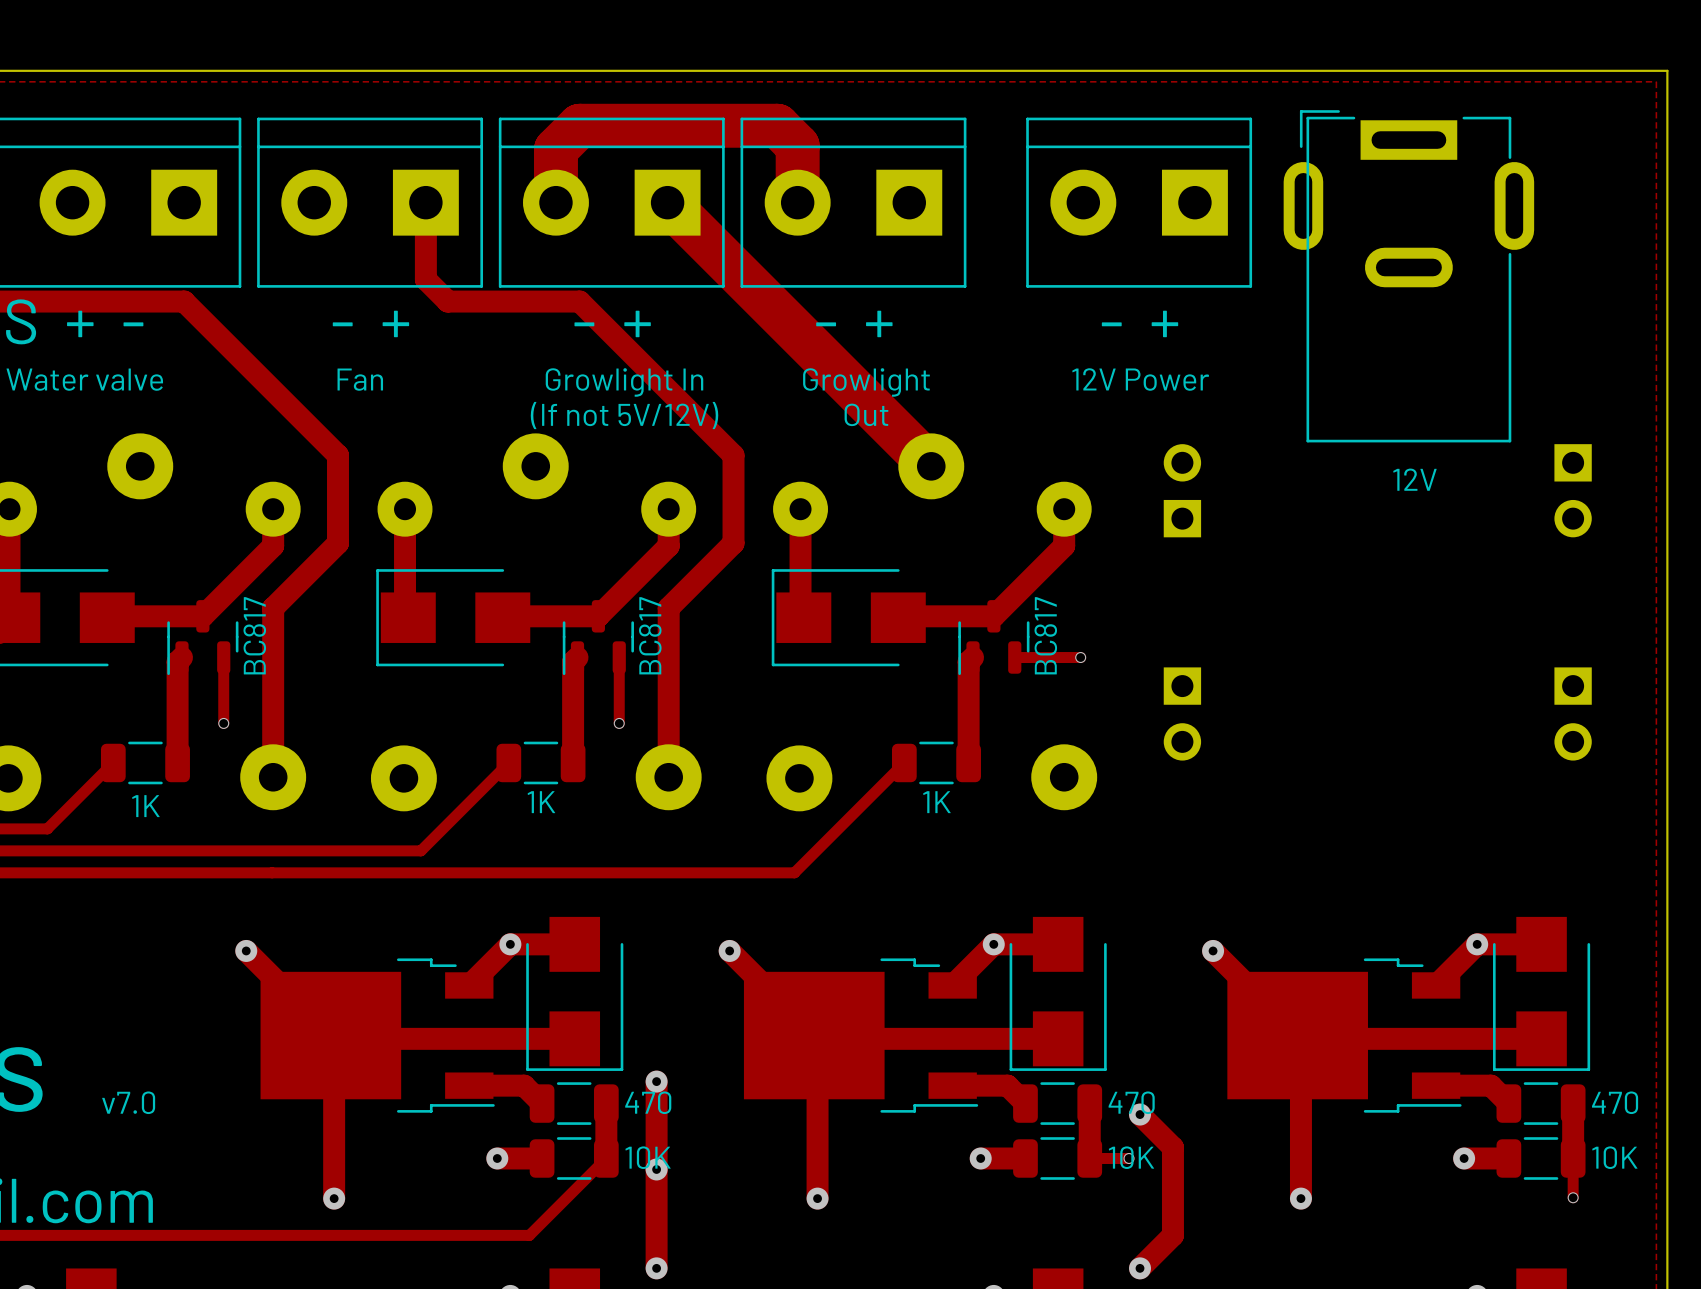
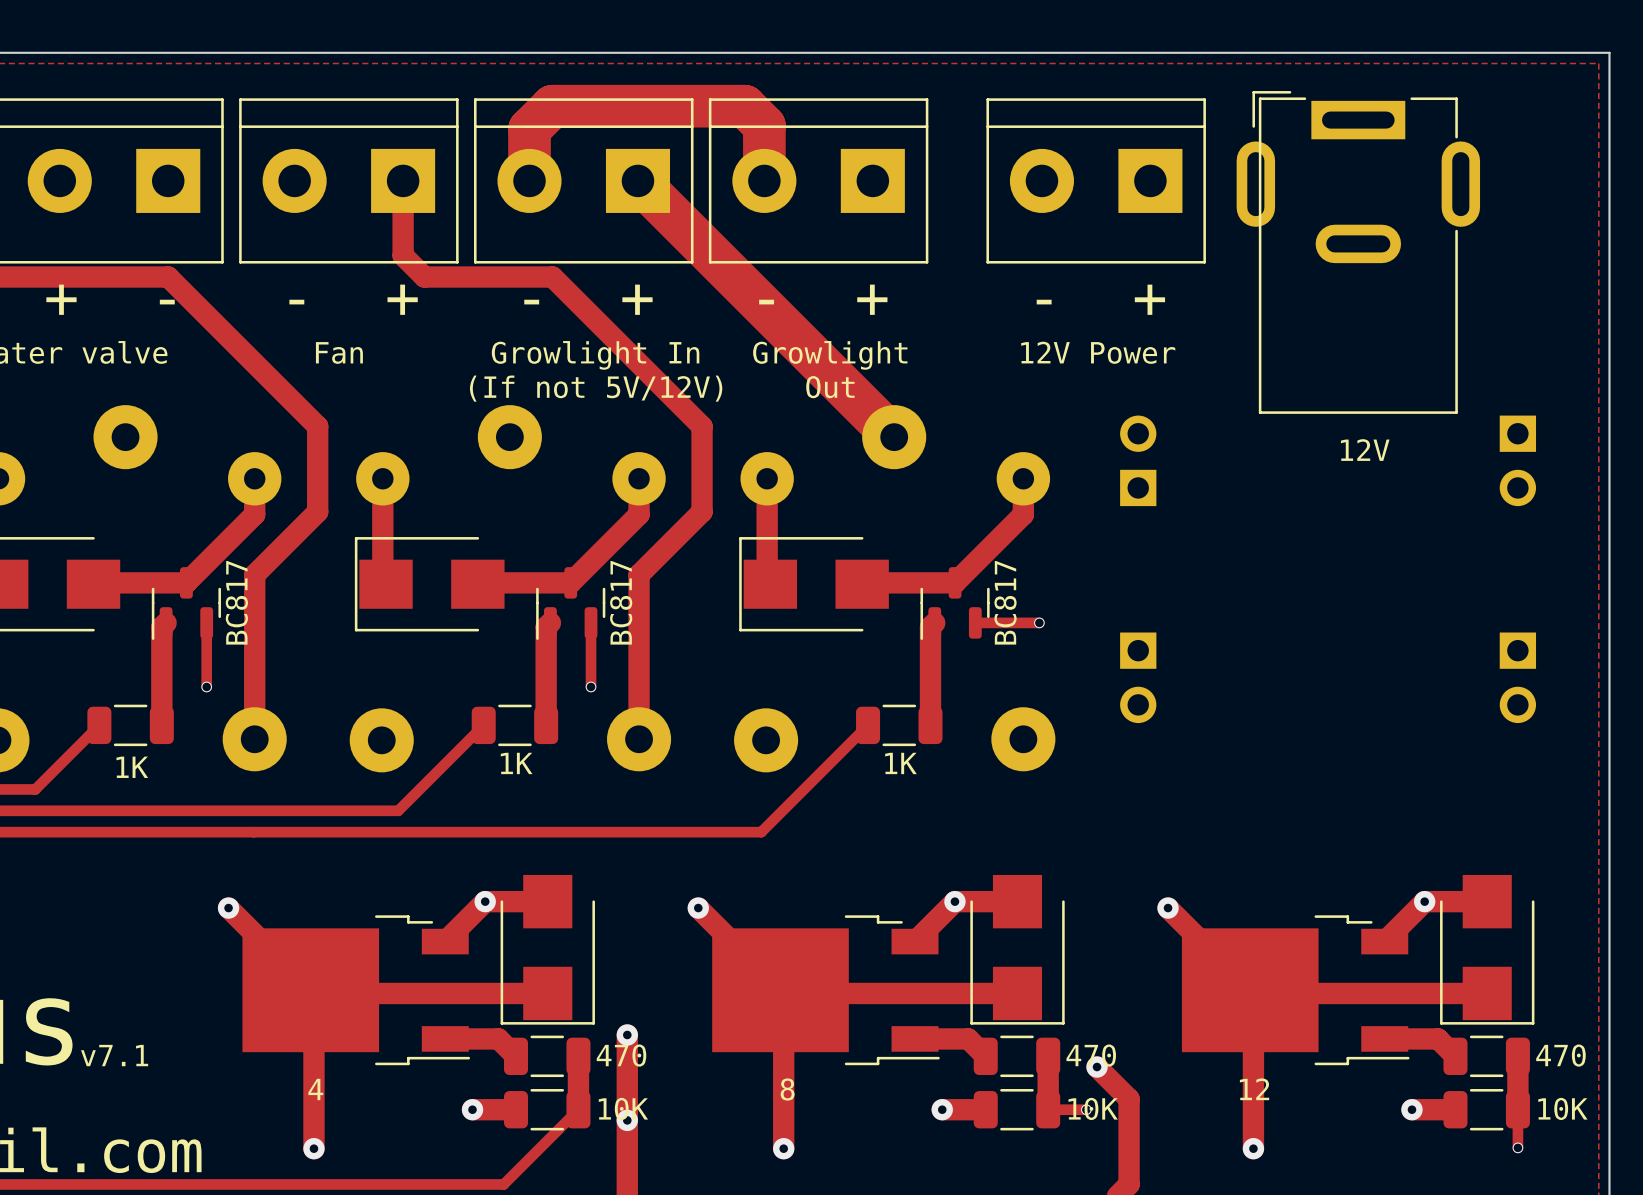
text: v7.0 (128, 1102) -> v7.1 (114, 1055)
text: none -> 4 (315, 1089)
text: none -> 8 (787, 1089)
text: none -> 12 (1254, 1089)

